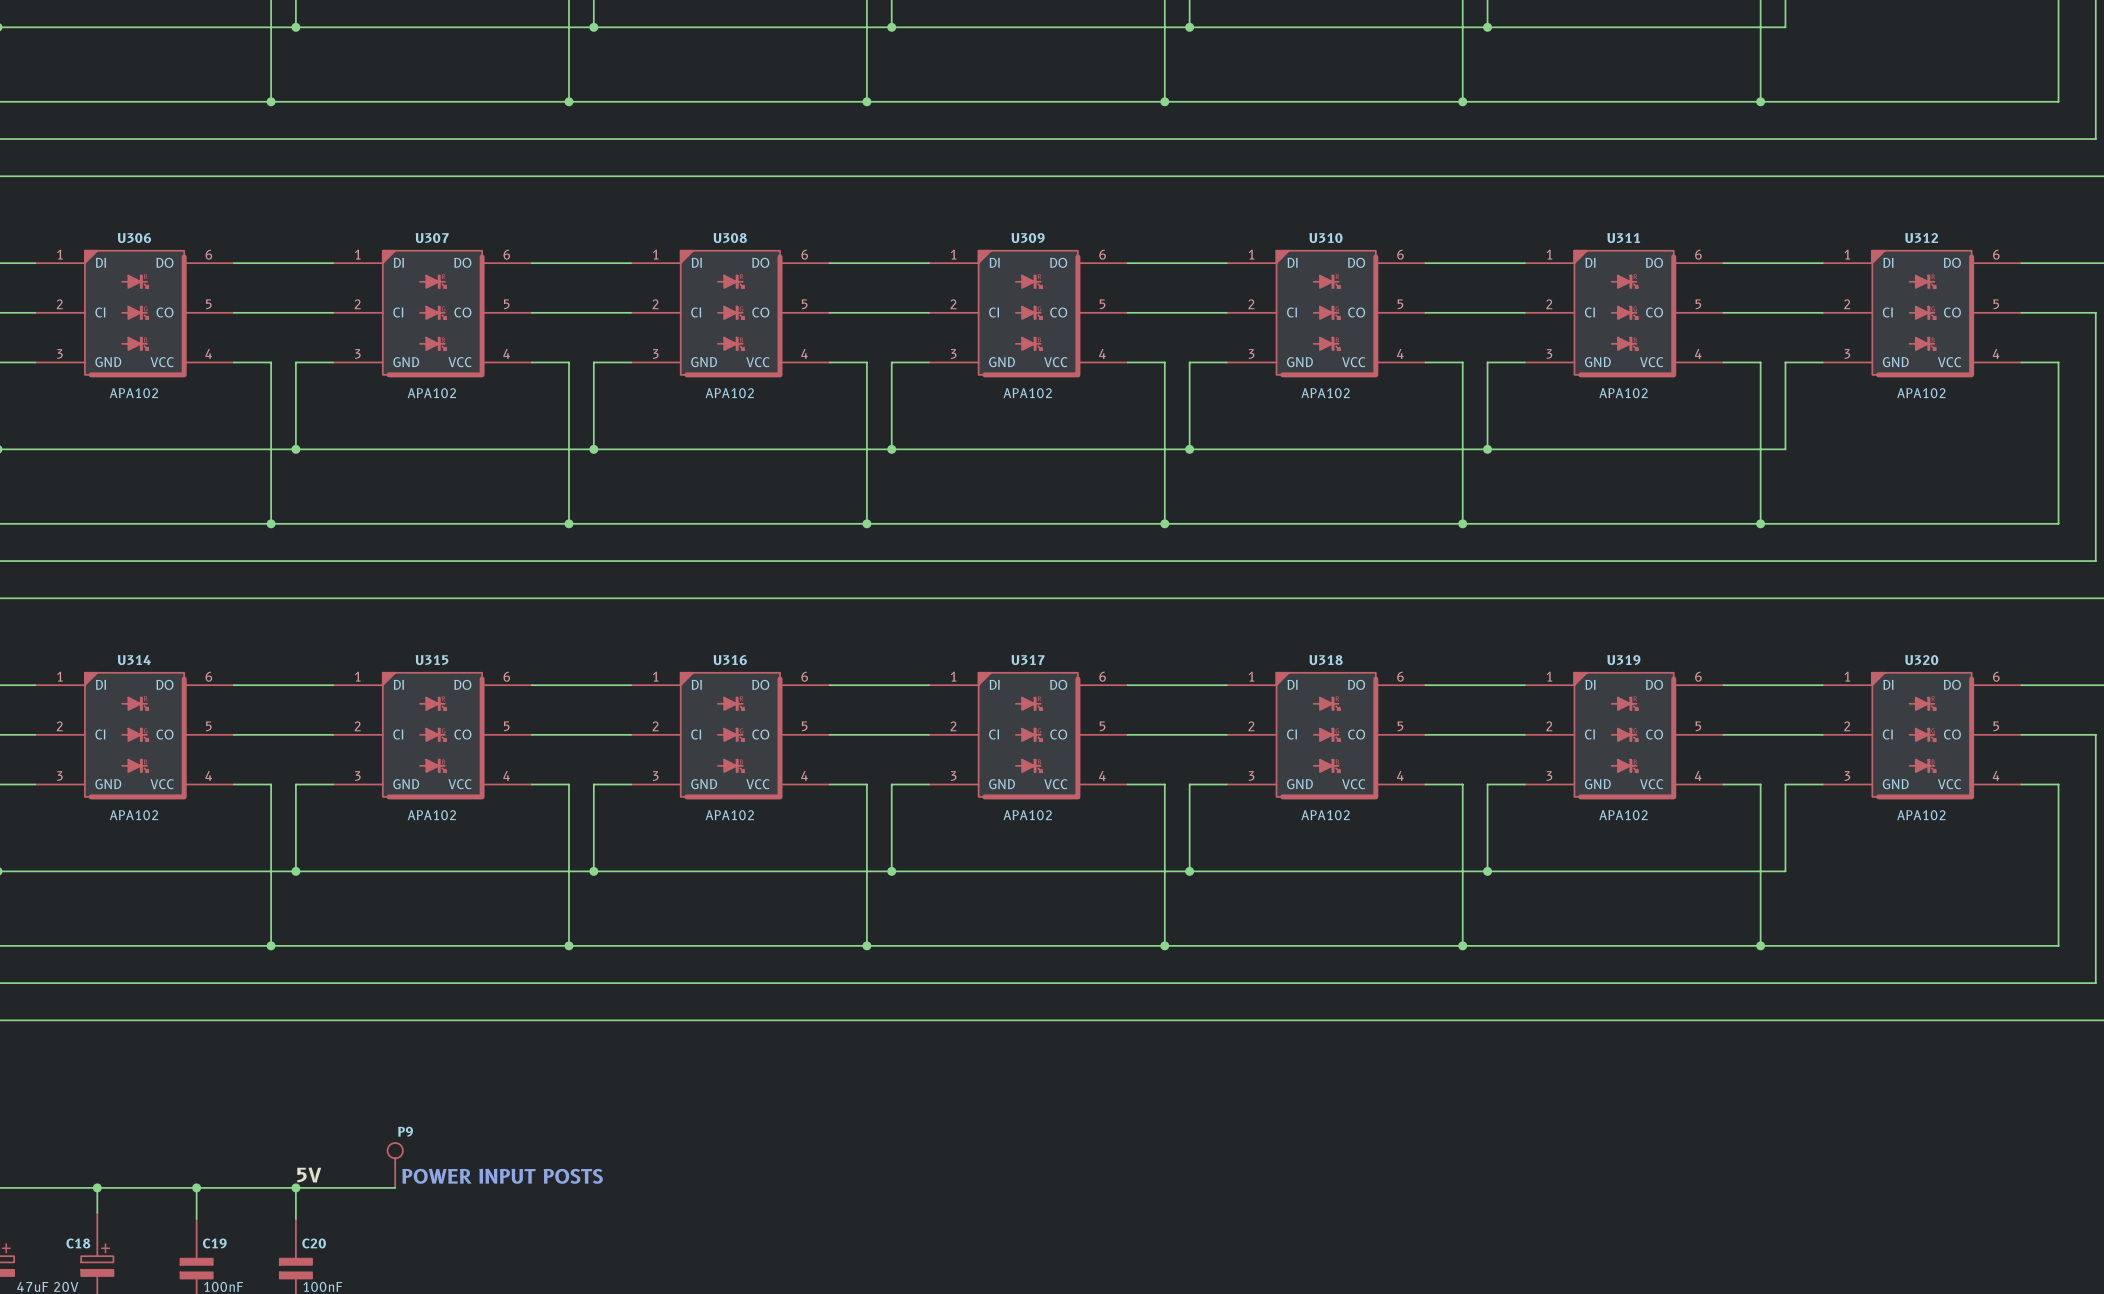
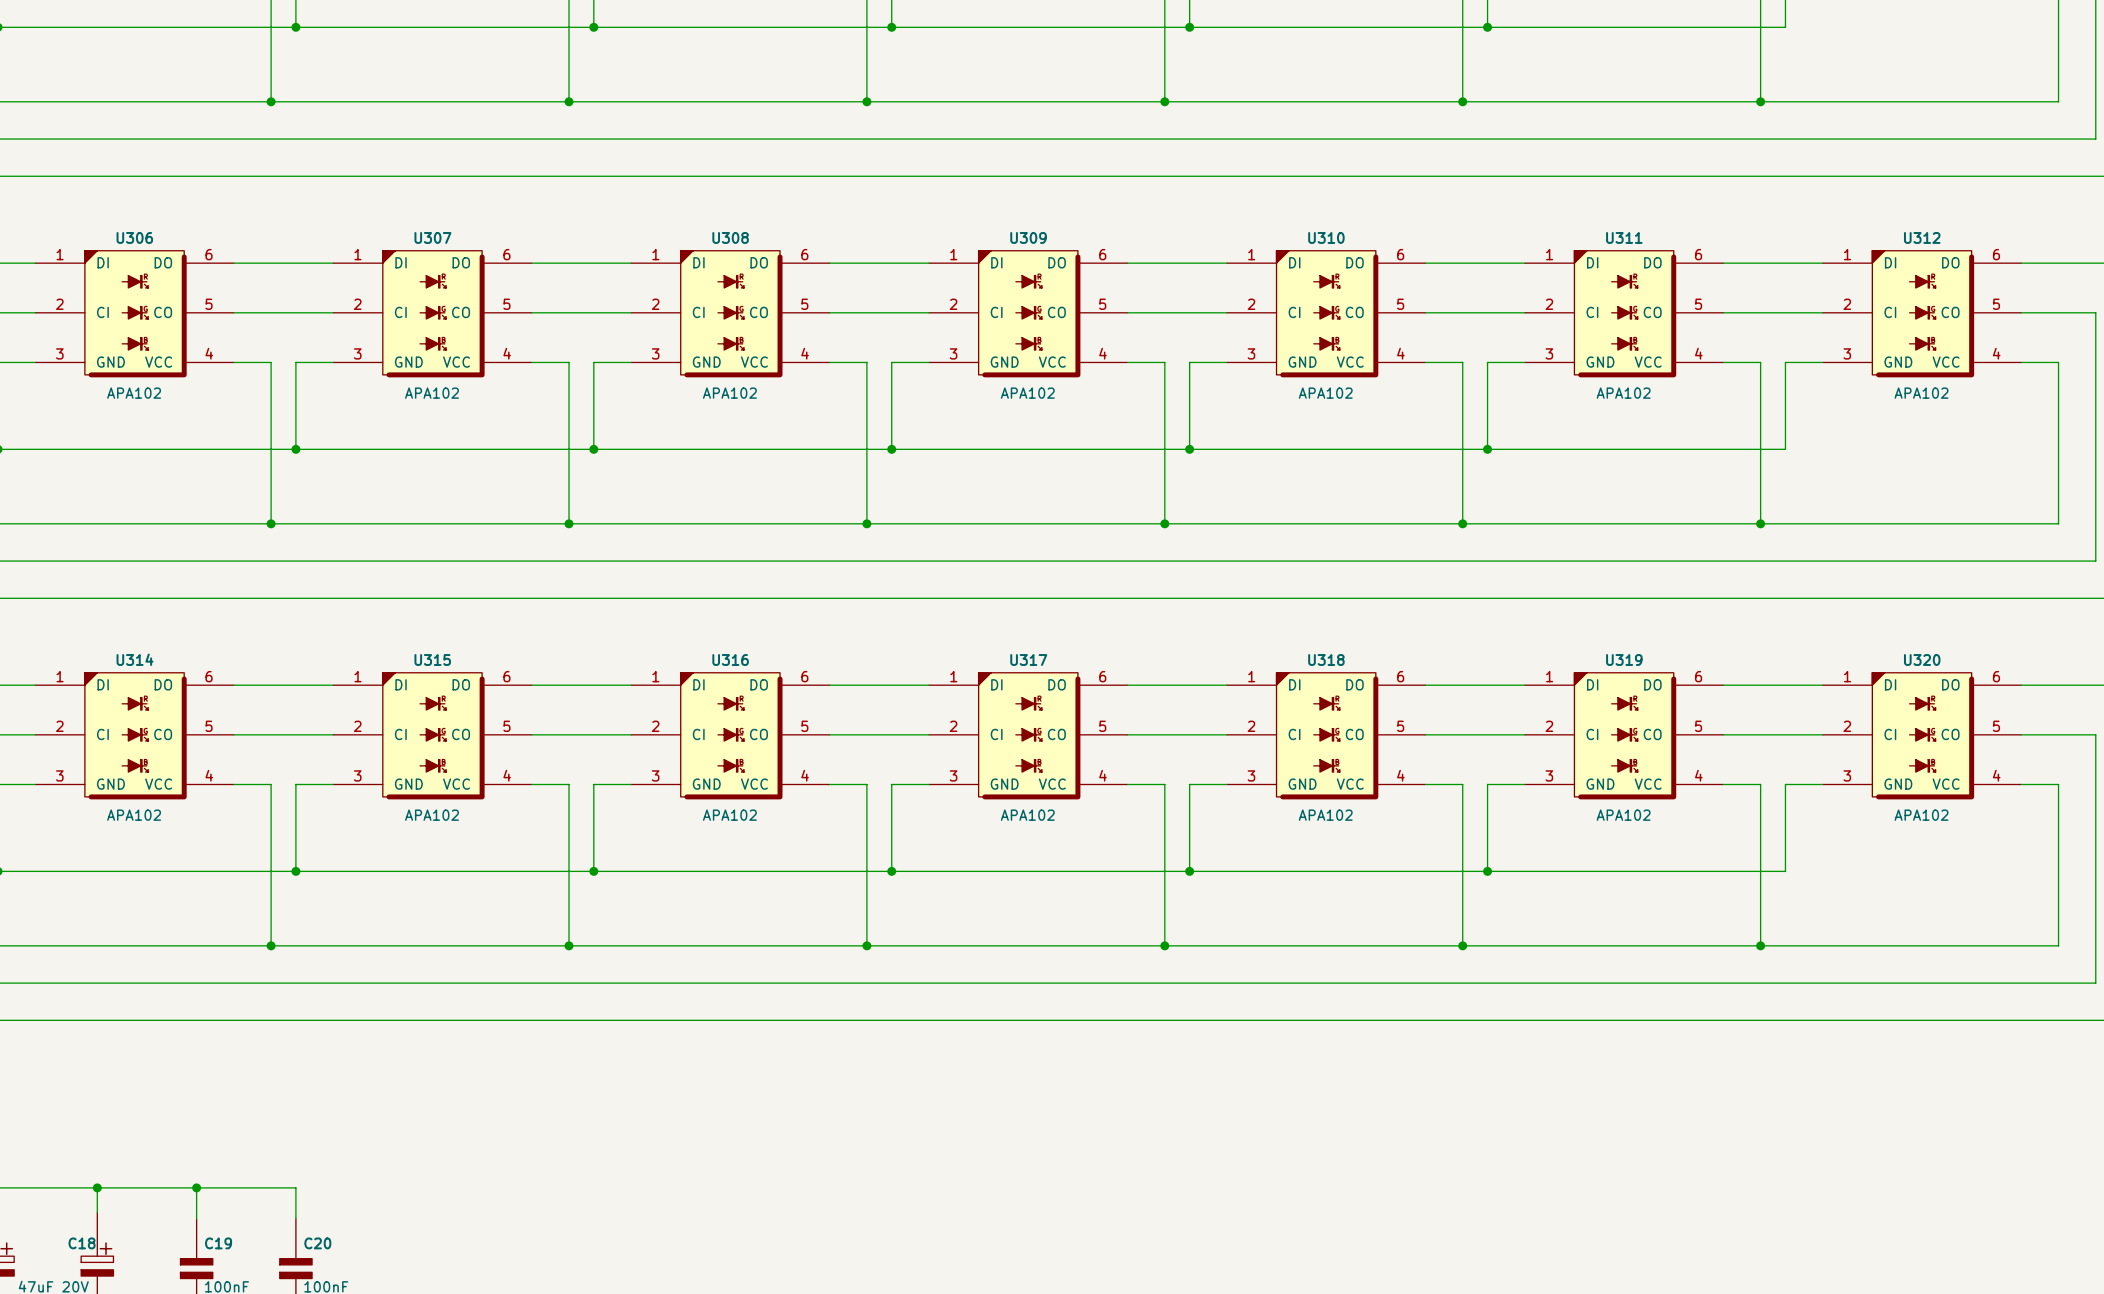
P9: (395, 1165) -> none
label: 5V (309, 1175) -> none
text: POWER INPUT POSTS (502, 1176) -> none
wire: (295, 1187) (395, 1187) -> none
junction: (295, 1187) -> none

